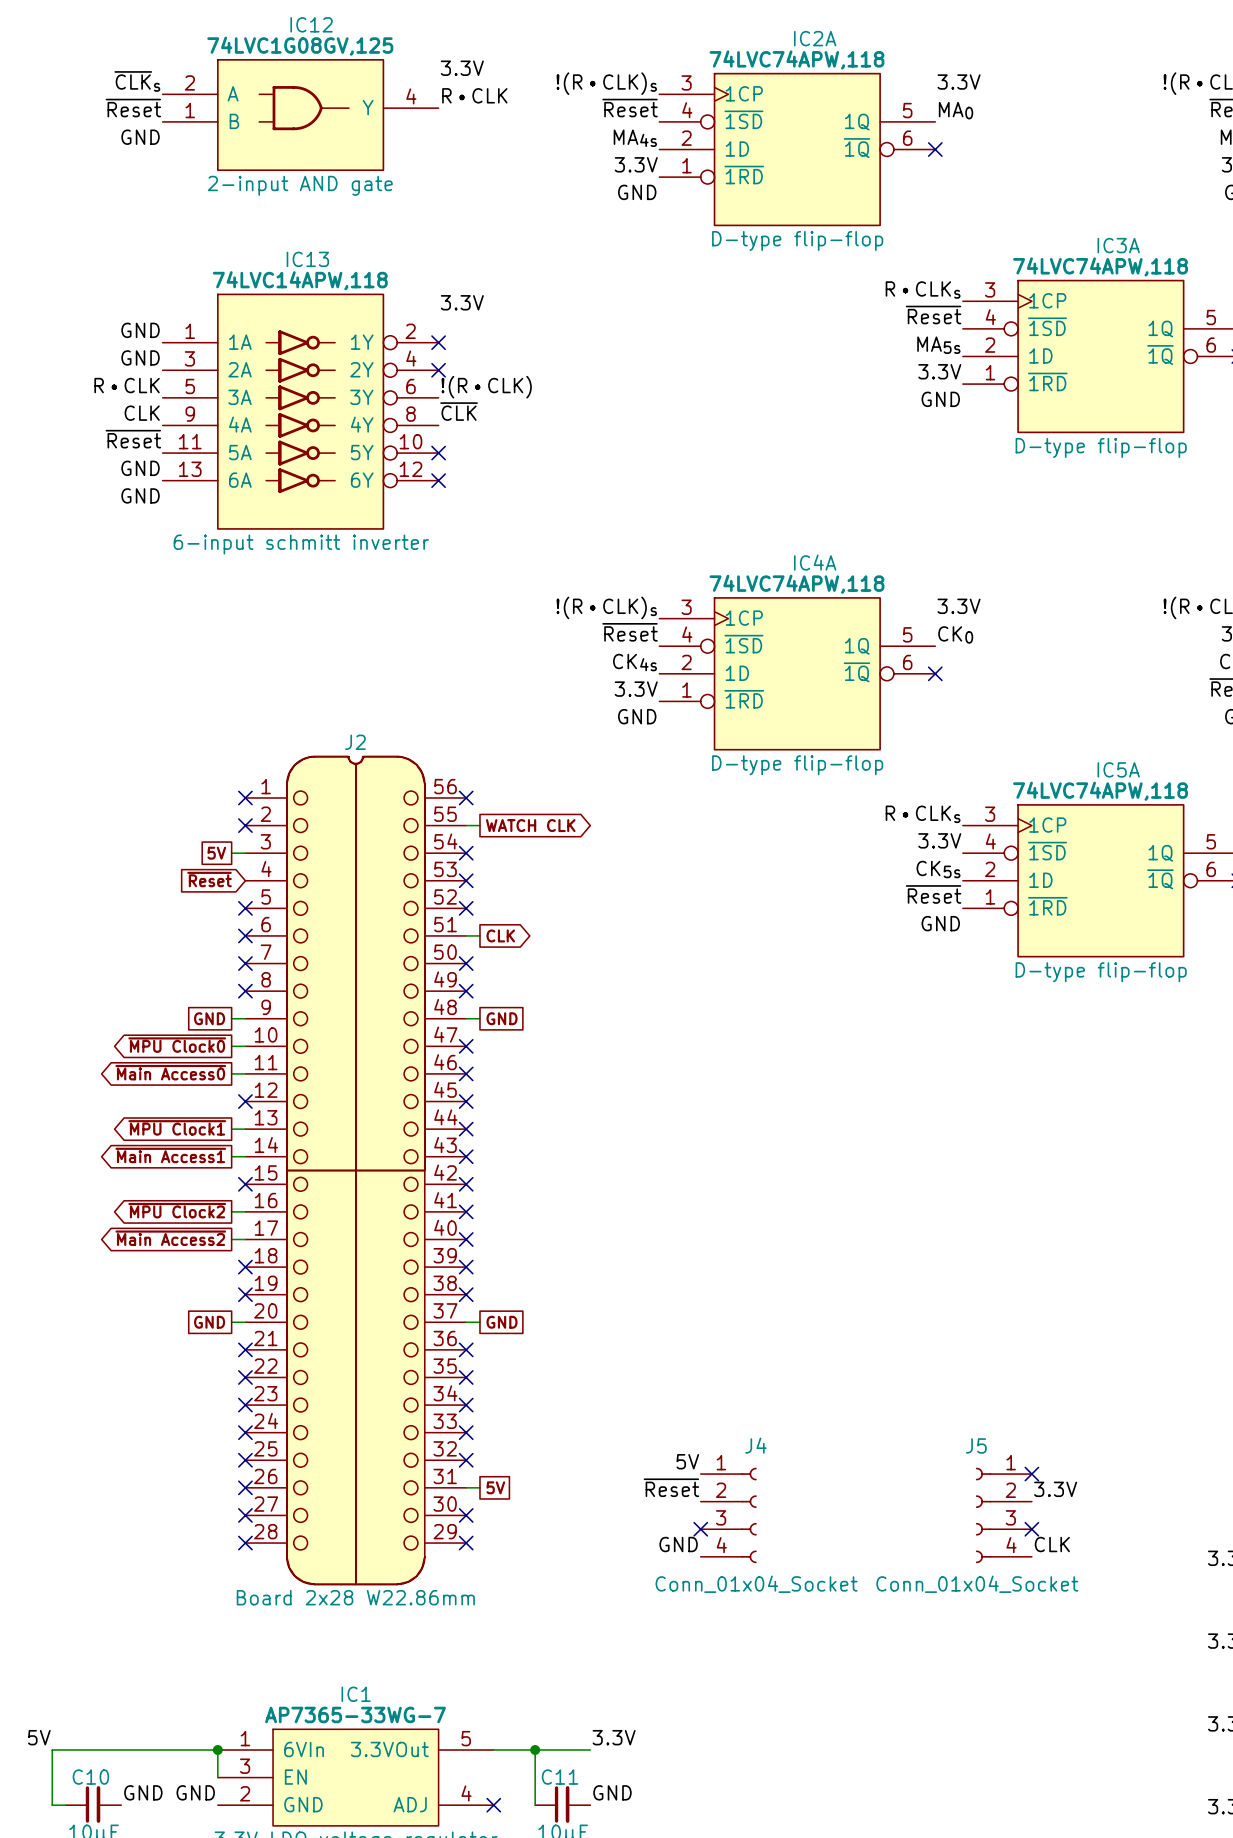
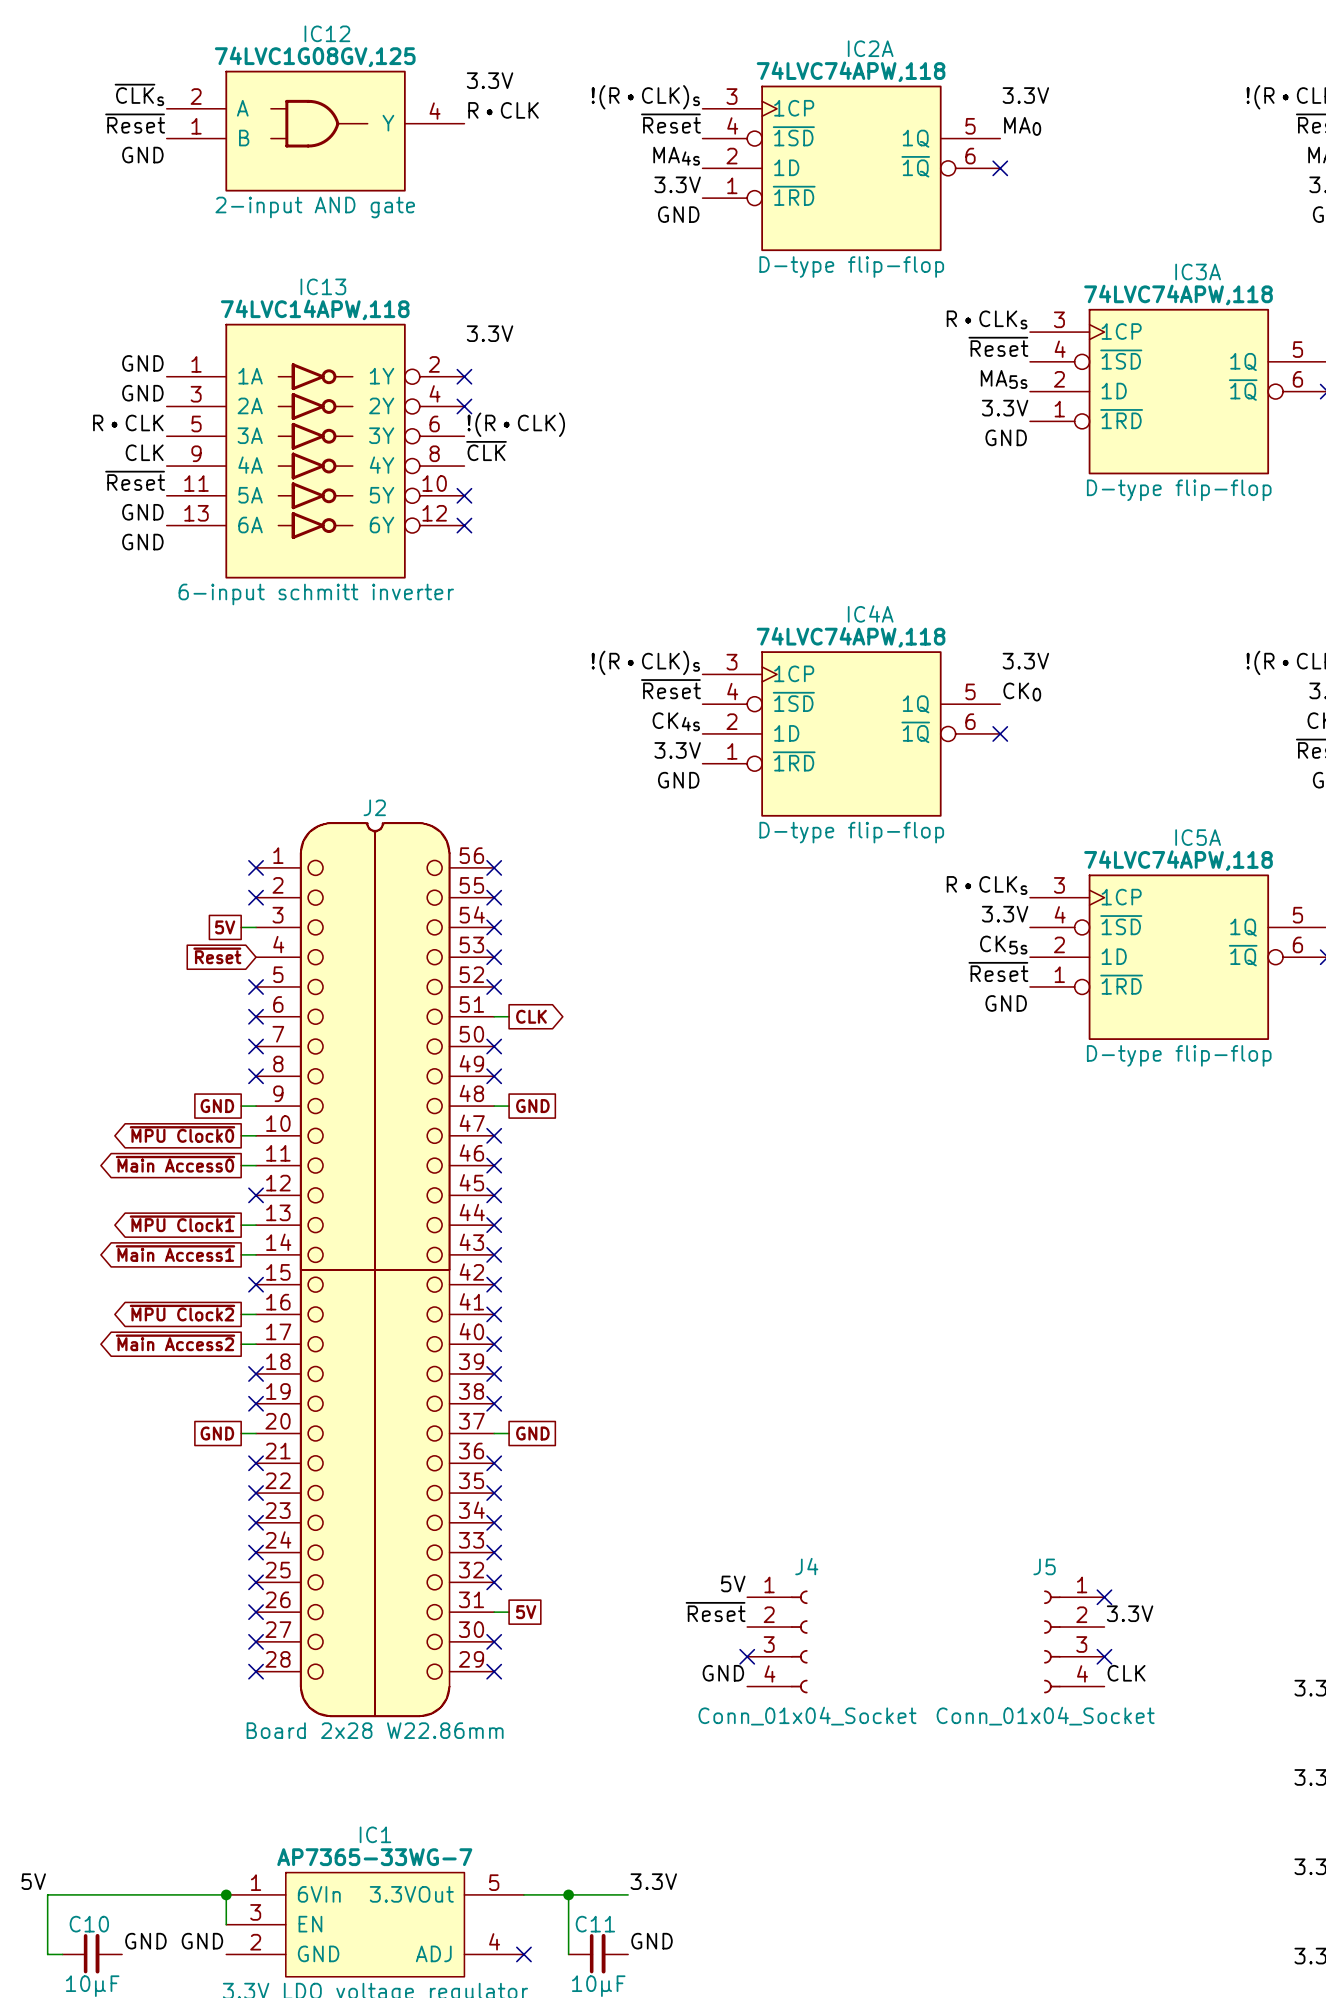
wire: (466, 825) (479, 825) -> none
no-connect mark: none -> (494, 897)
global label: WATCH CLK (530, 825) -> none

